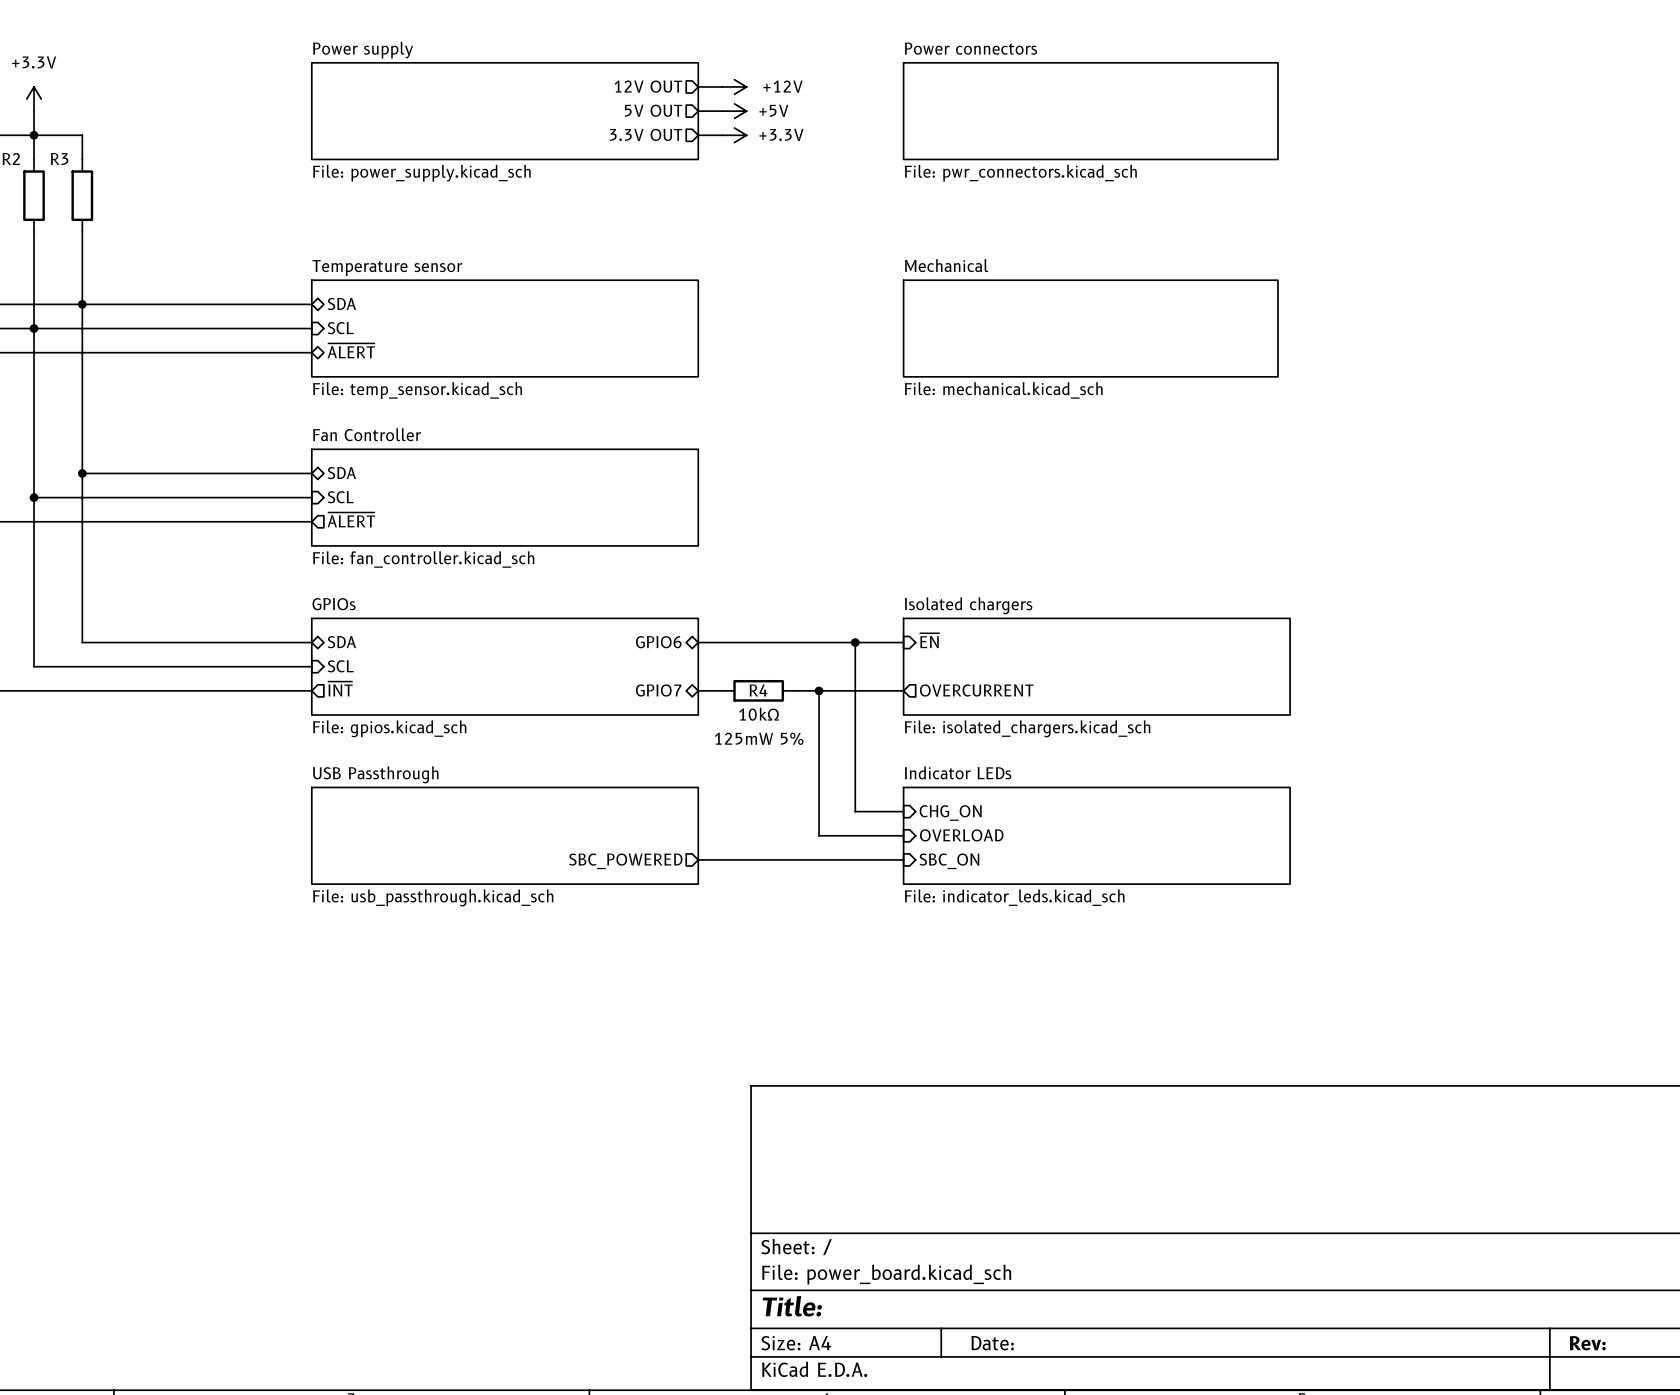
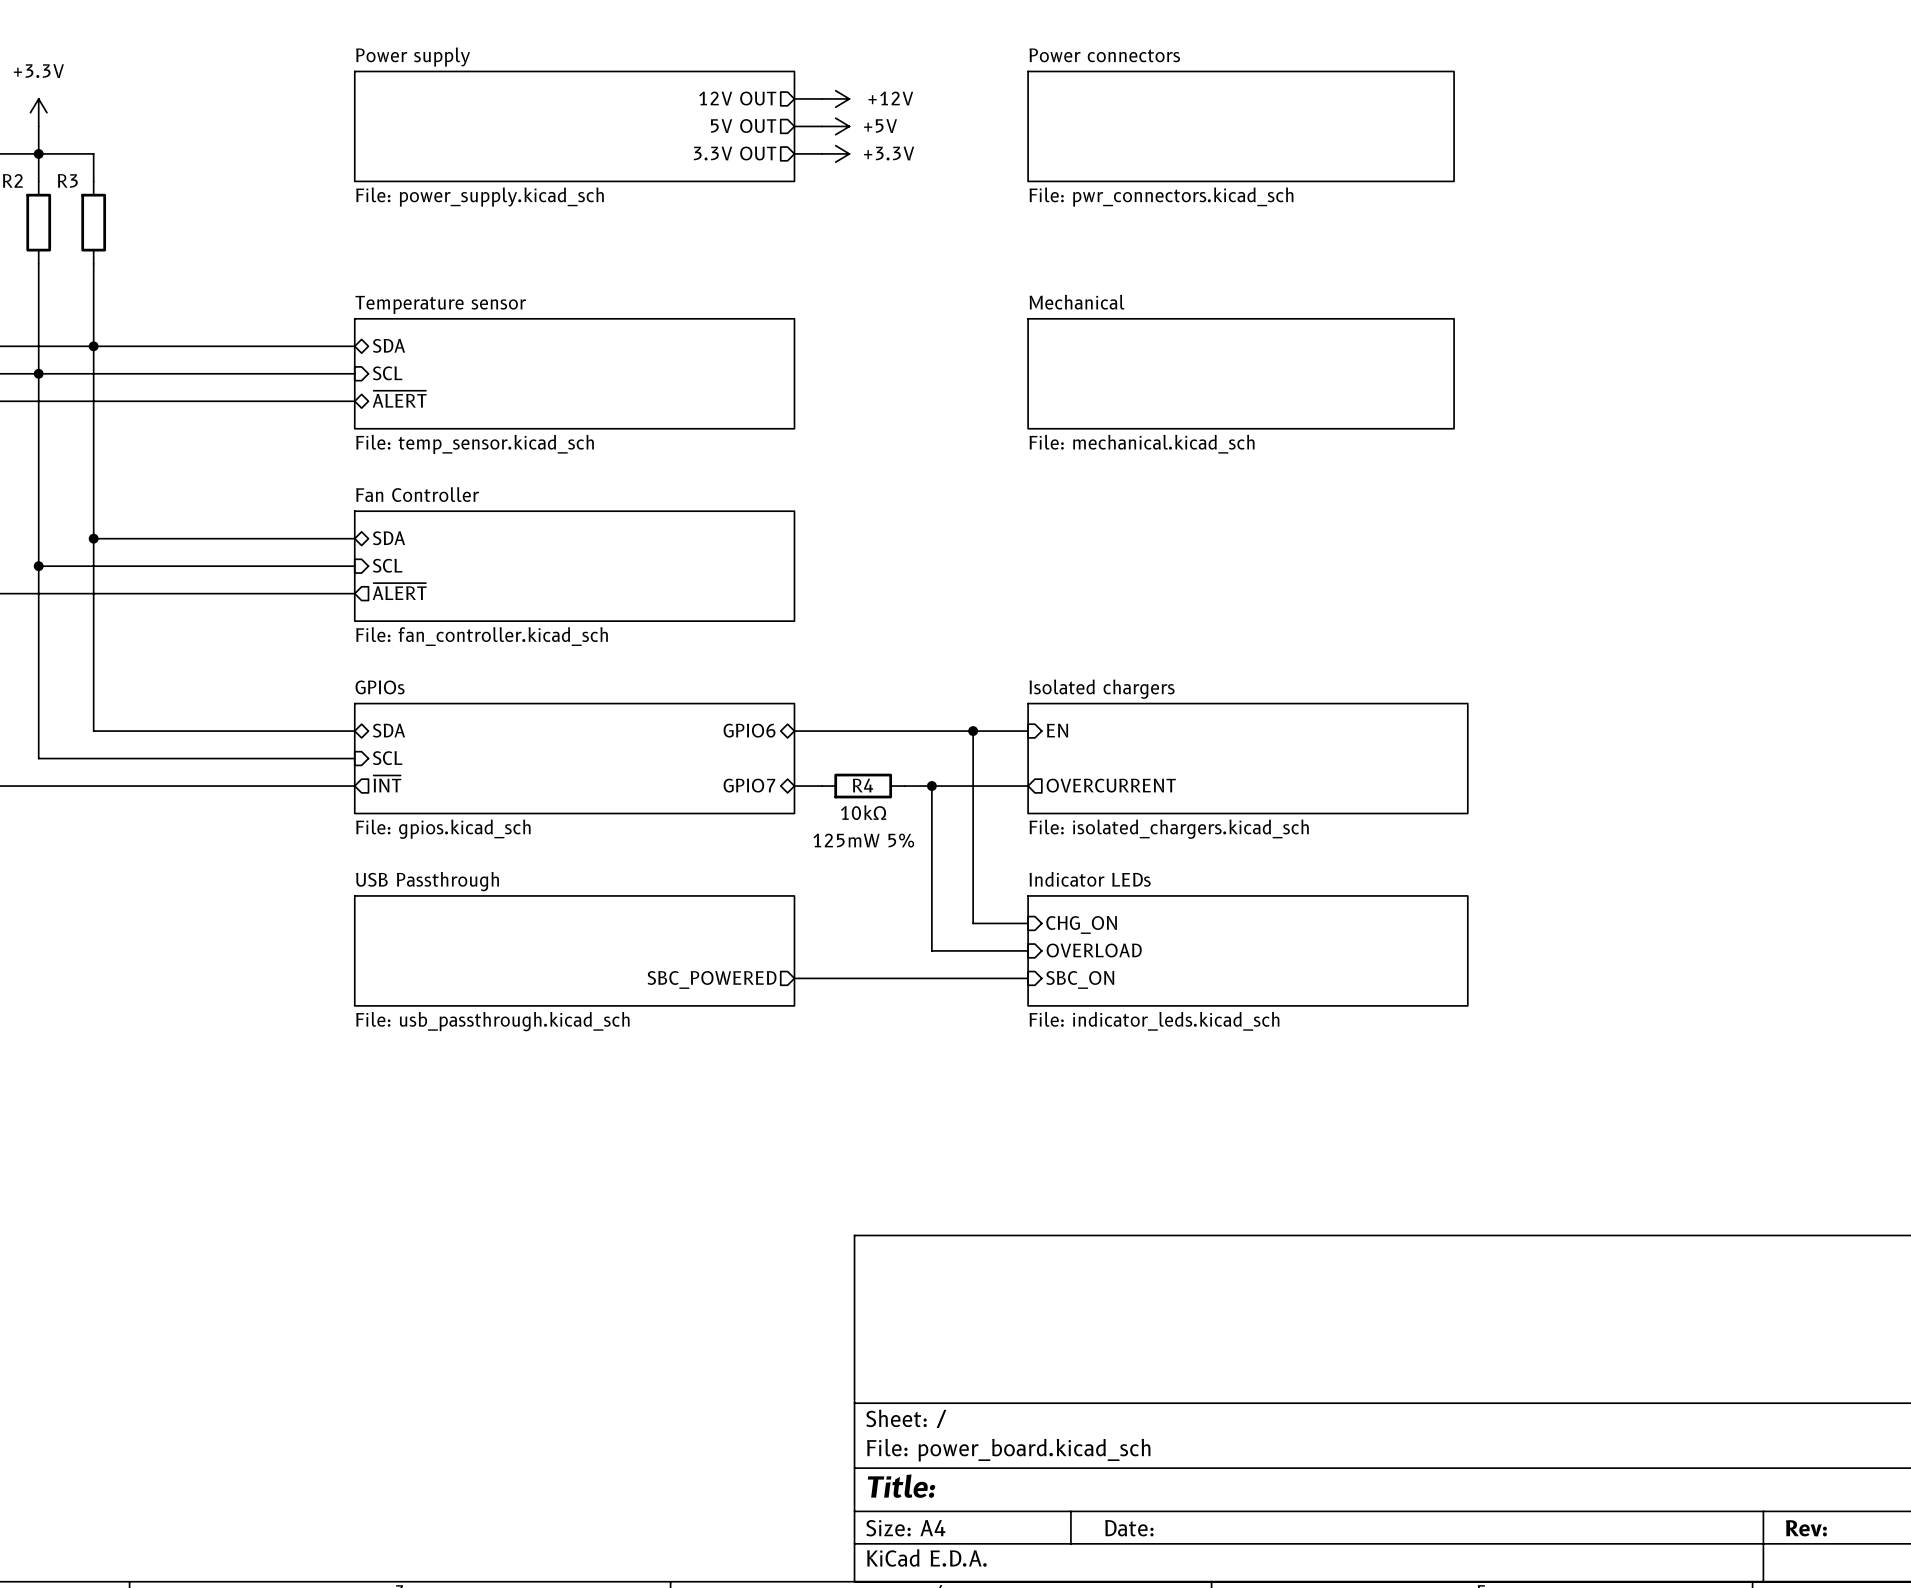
sheet pin: ~{EN} (929, 640) -> EN (1057, 730)

